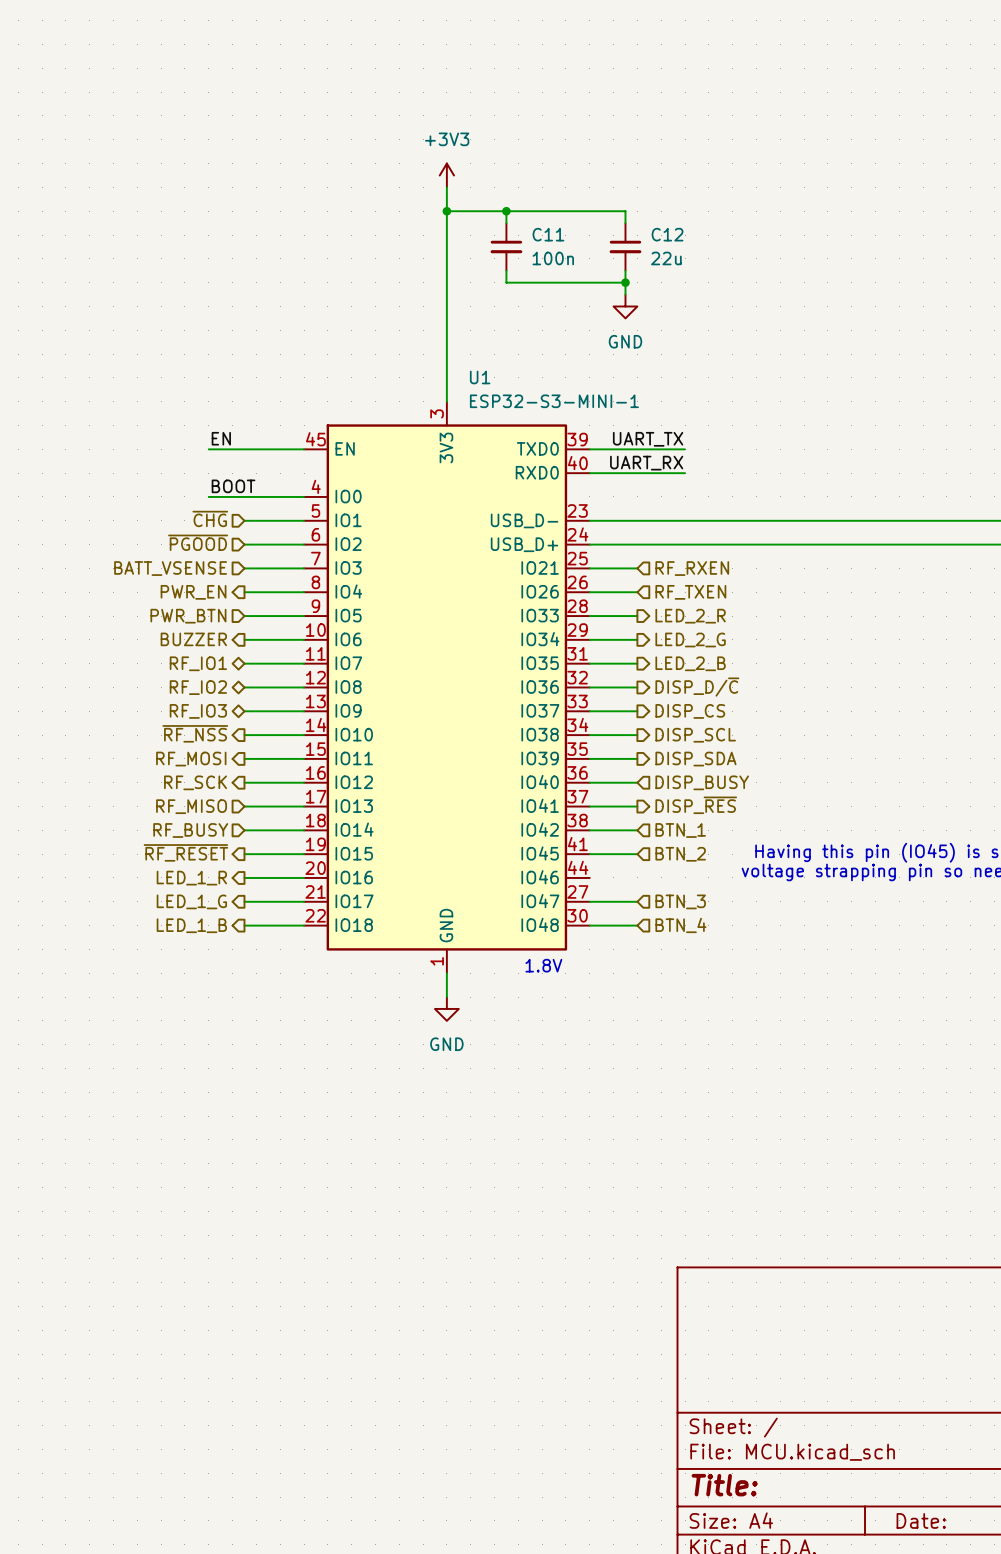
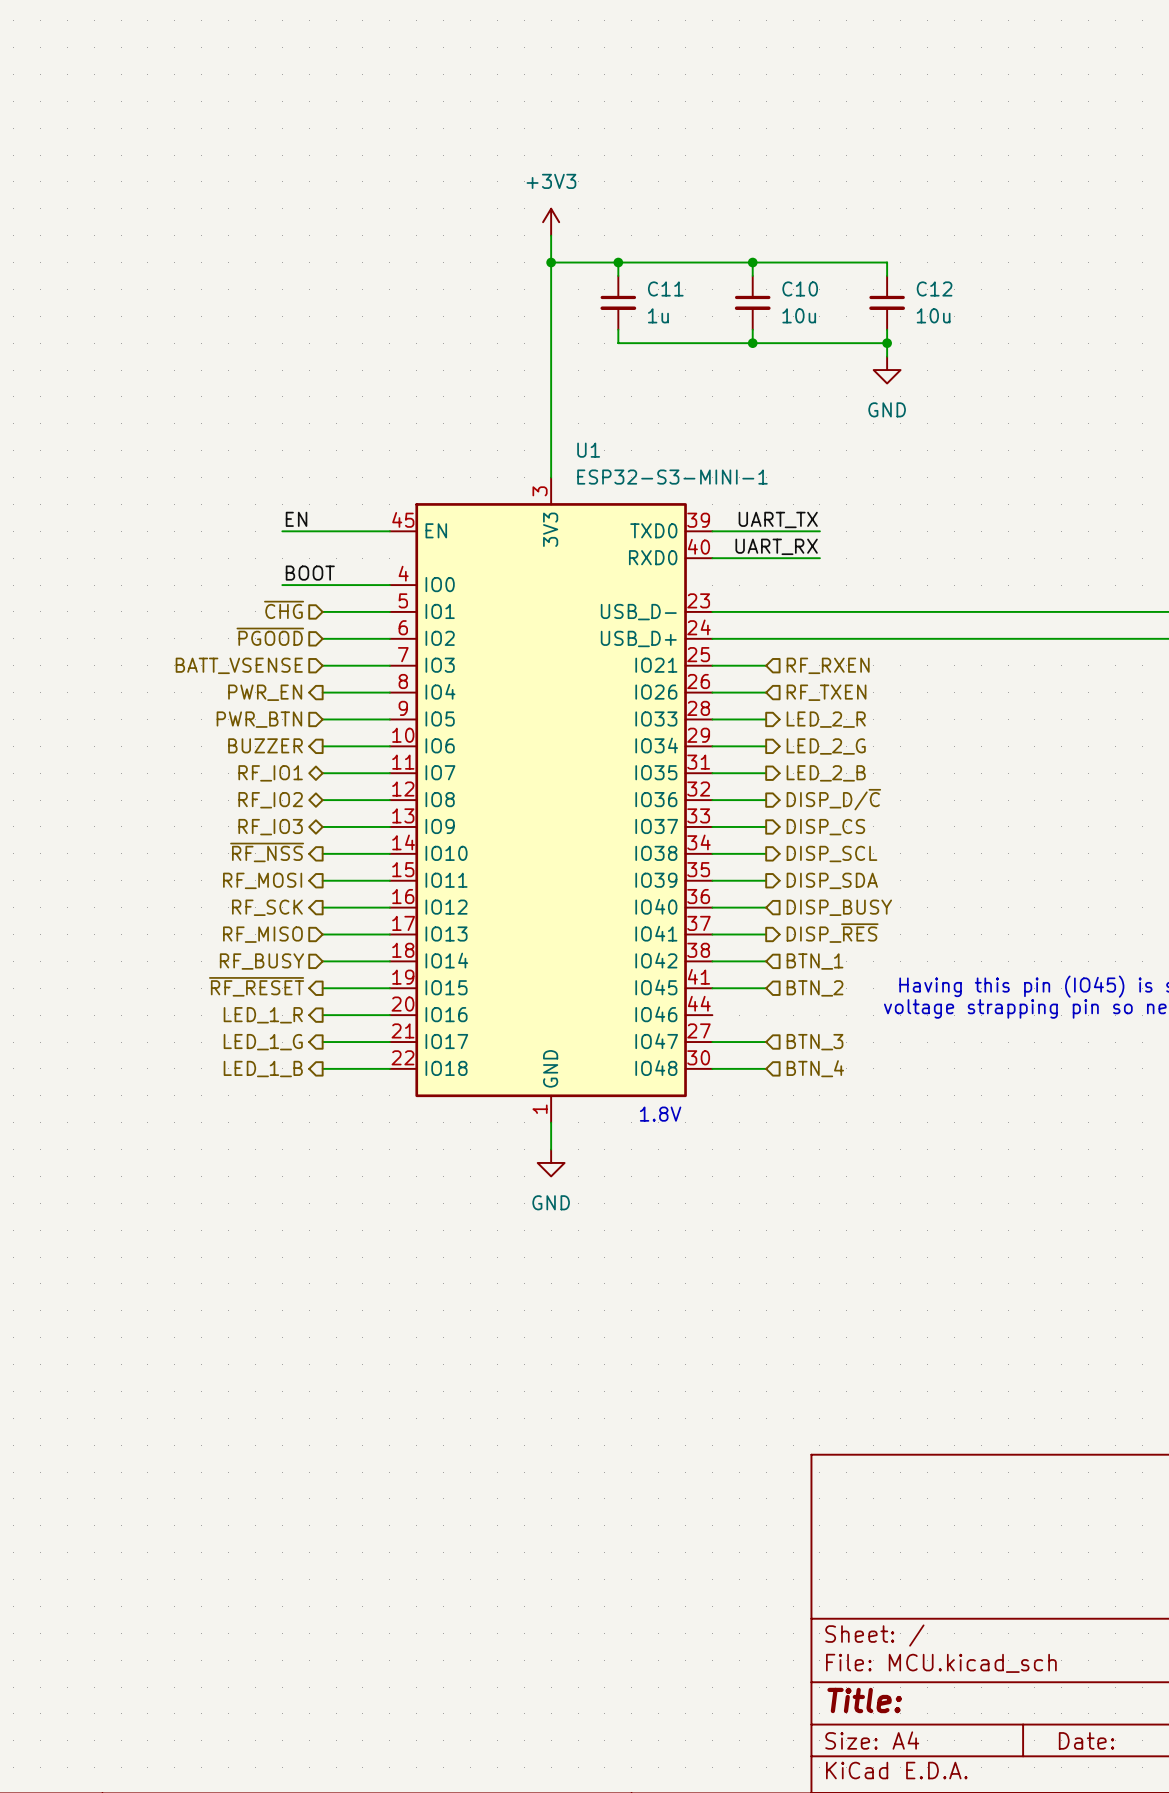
wire: none -> (752, 262) (887, 262) (887, 275)
junction: none -> (752, 262)
C12 name: C12 (667, 234) -> C10 (800, 288)
C12: none -> 10u (887, 302)
C11 value: 100n (553, 258) -> 1u (658, 315)
C12 value: 22u (666, 258) -> 10u (799, 315)
wire: none -> (887, 329) (887, 356)
wire: (625, 282) (625, 294) -> (752, 343) (887, 343)
junction: none -> (887, 343)
power symbol position: GND (625, 306) -> GND (887, 370)

